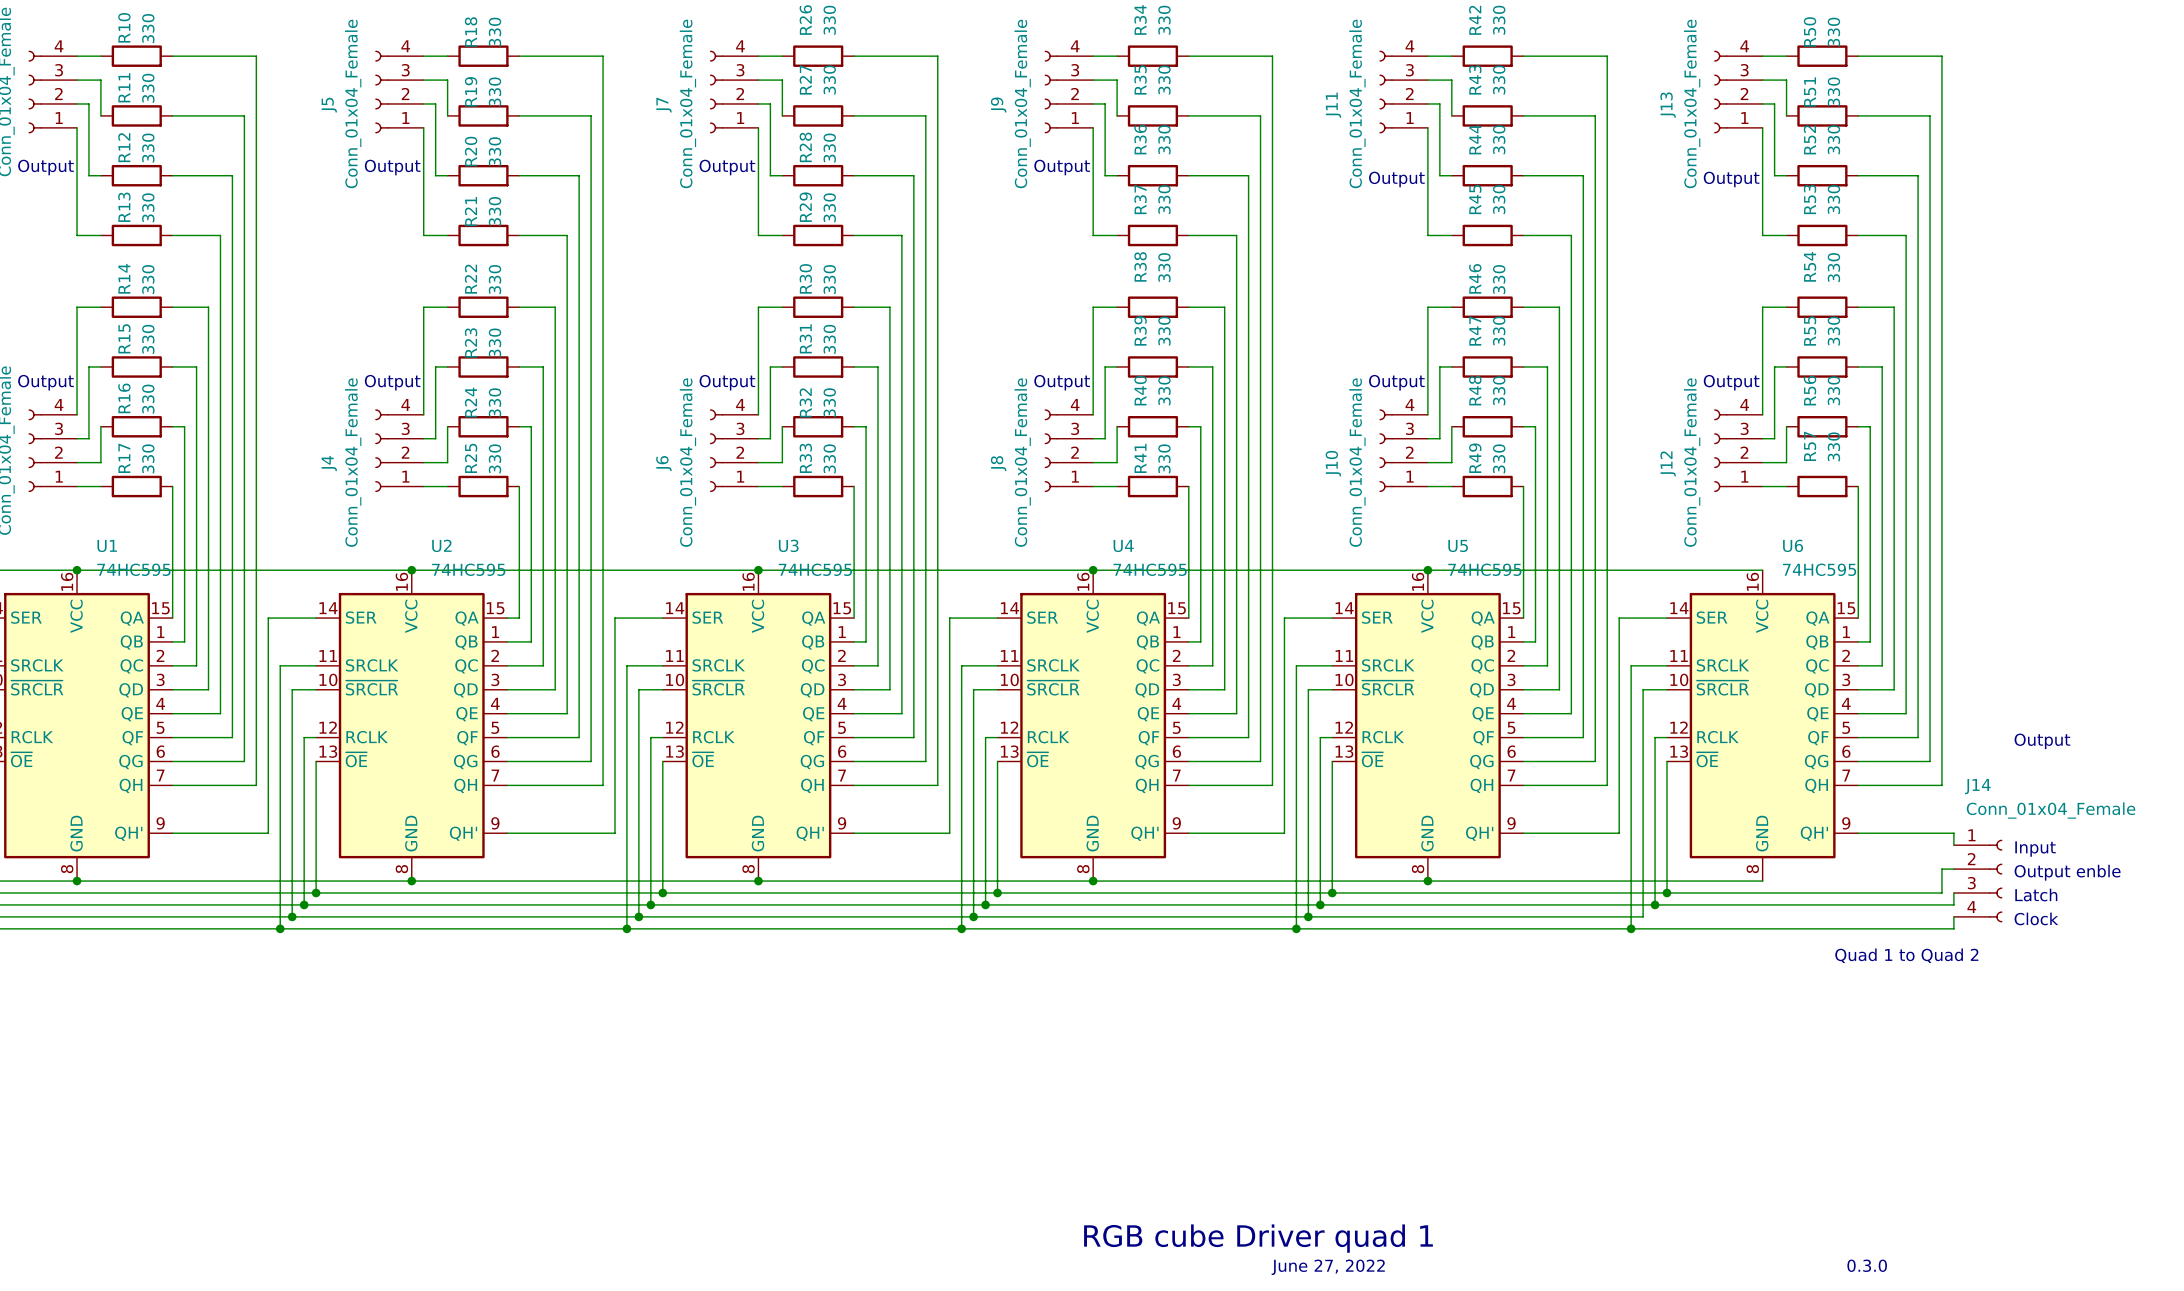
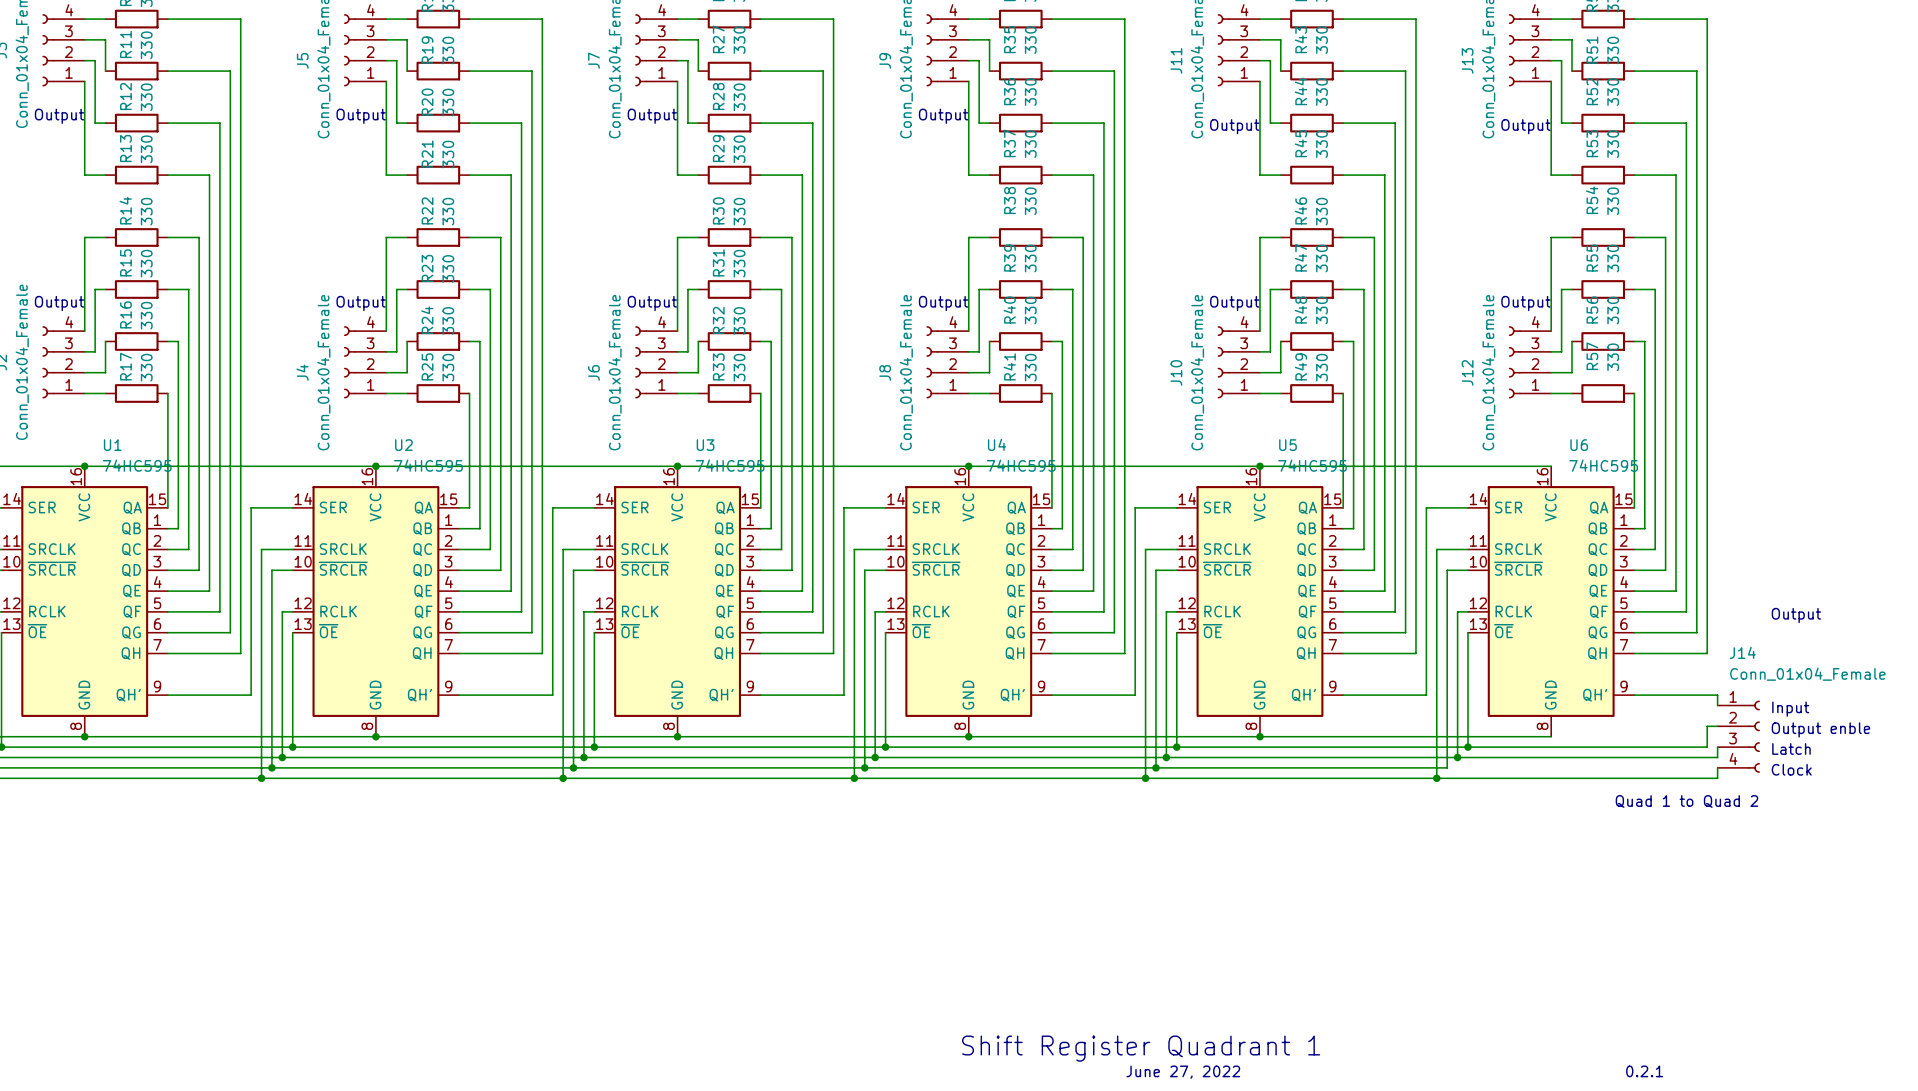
text: RGB cube Driver quad 1 (1258, 1238) -> Shift Register Quadrant 1 (1141, 1048)
text: 0.3.0 (1867, 1265) -> 0.2.1 (1644, 1071)

